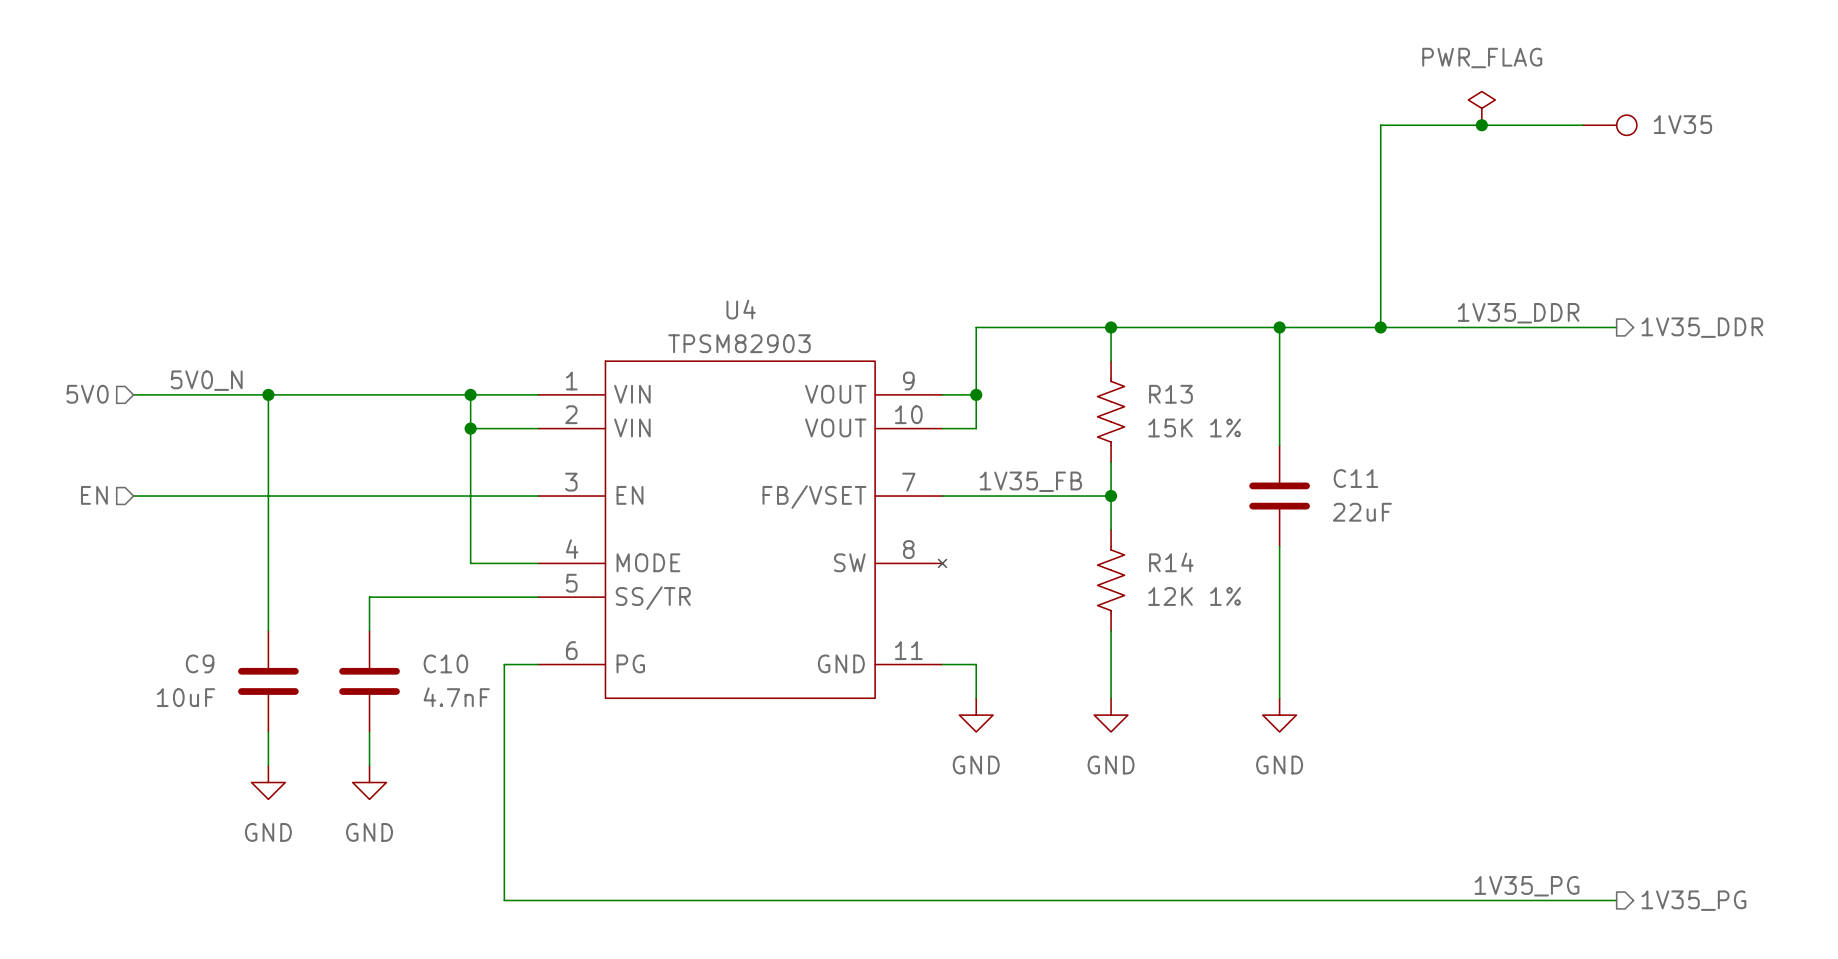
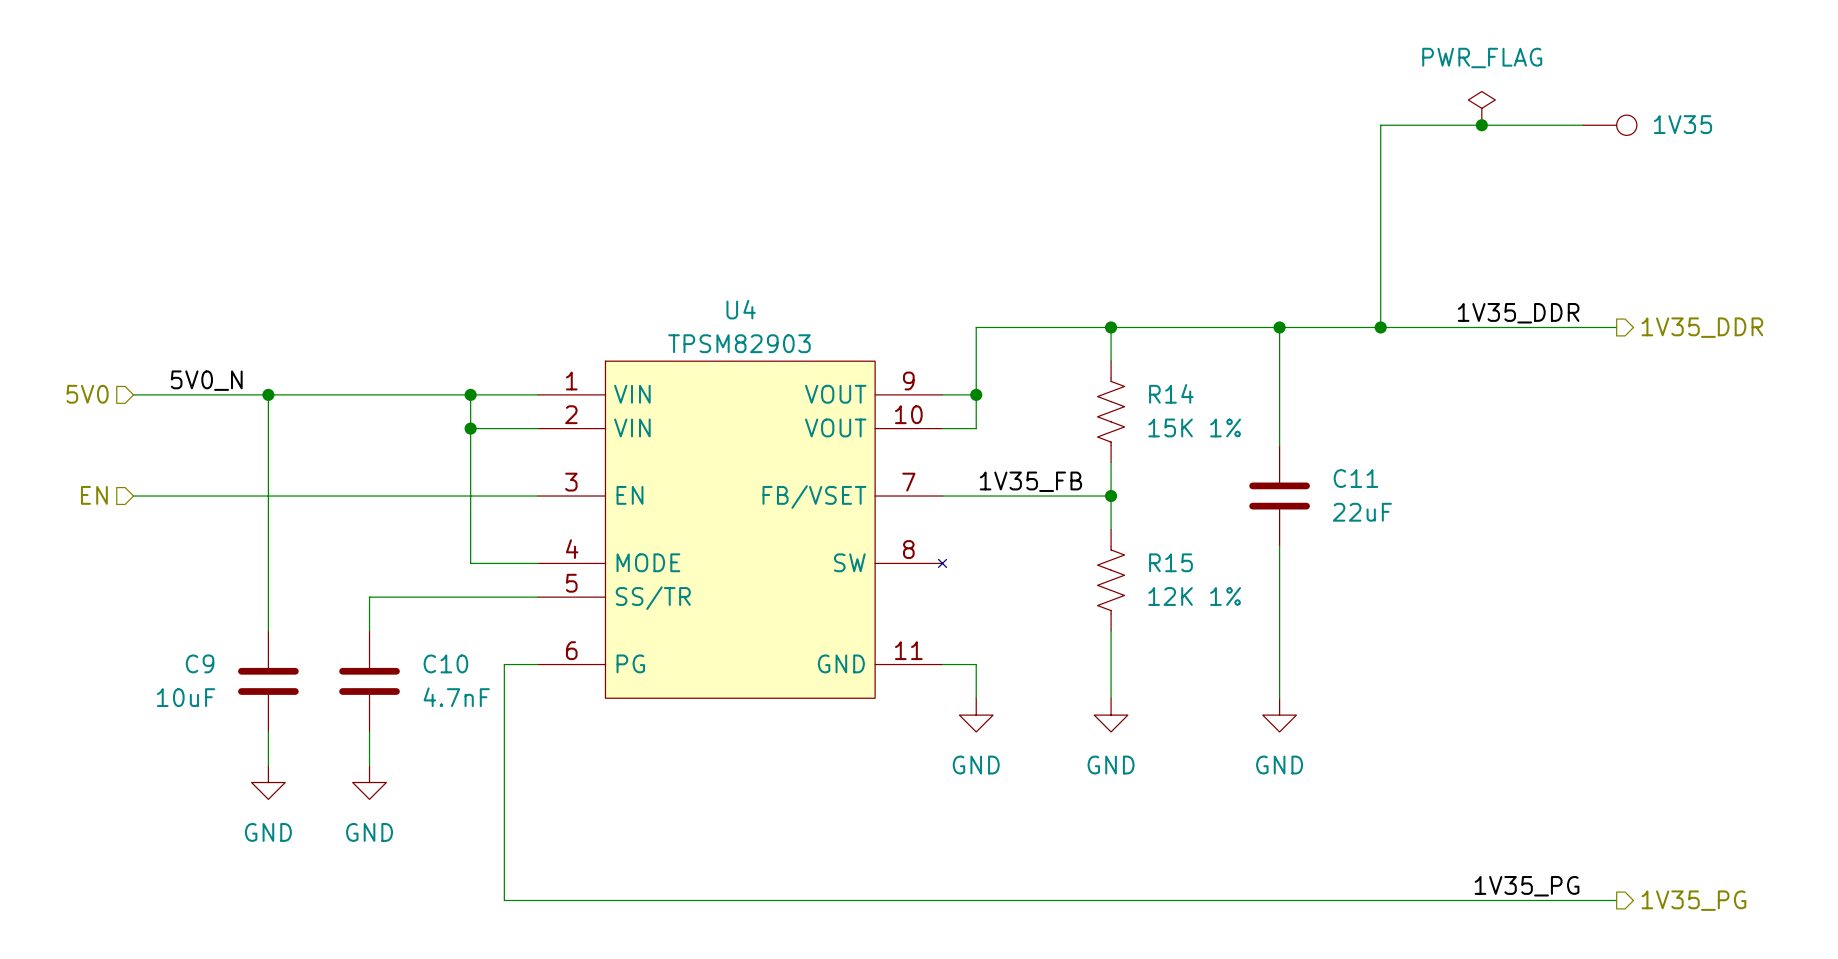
R13 name: R13 (1170, 394) -> R14 (1171, 393)
R14 name: R14 (1171, 562) -> R15 (1170, 562)

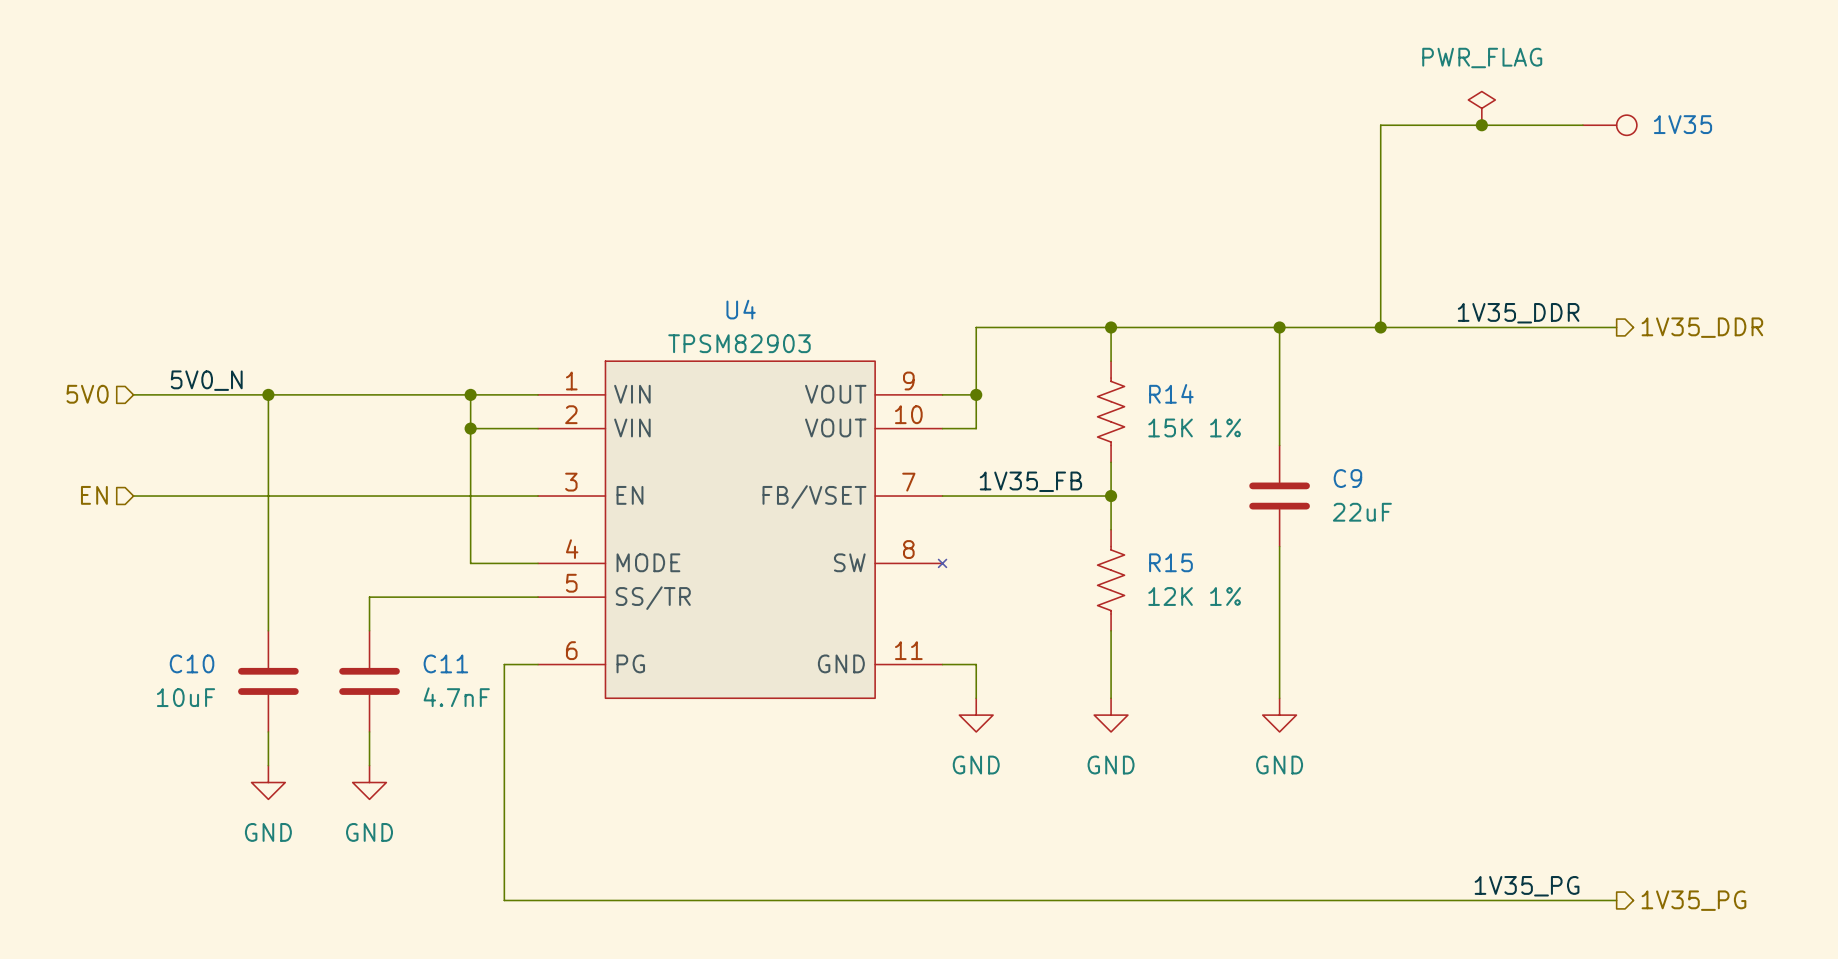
C11 name: C11 (1355, 478) -> C9 (1347, 478)
C9 name: C9 (200, 663) -> C10 (192, 663)
C10 name: C10 (445, 663) -> C11 (445, 663)

